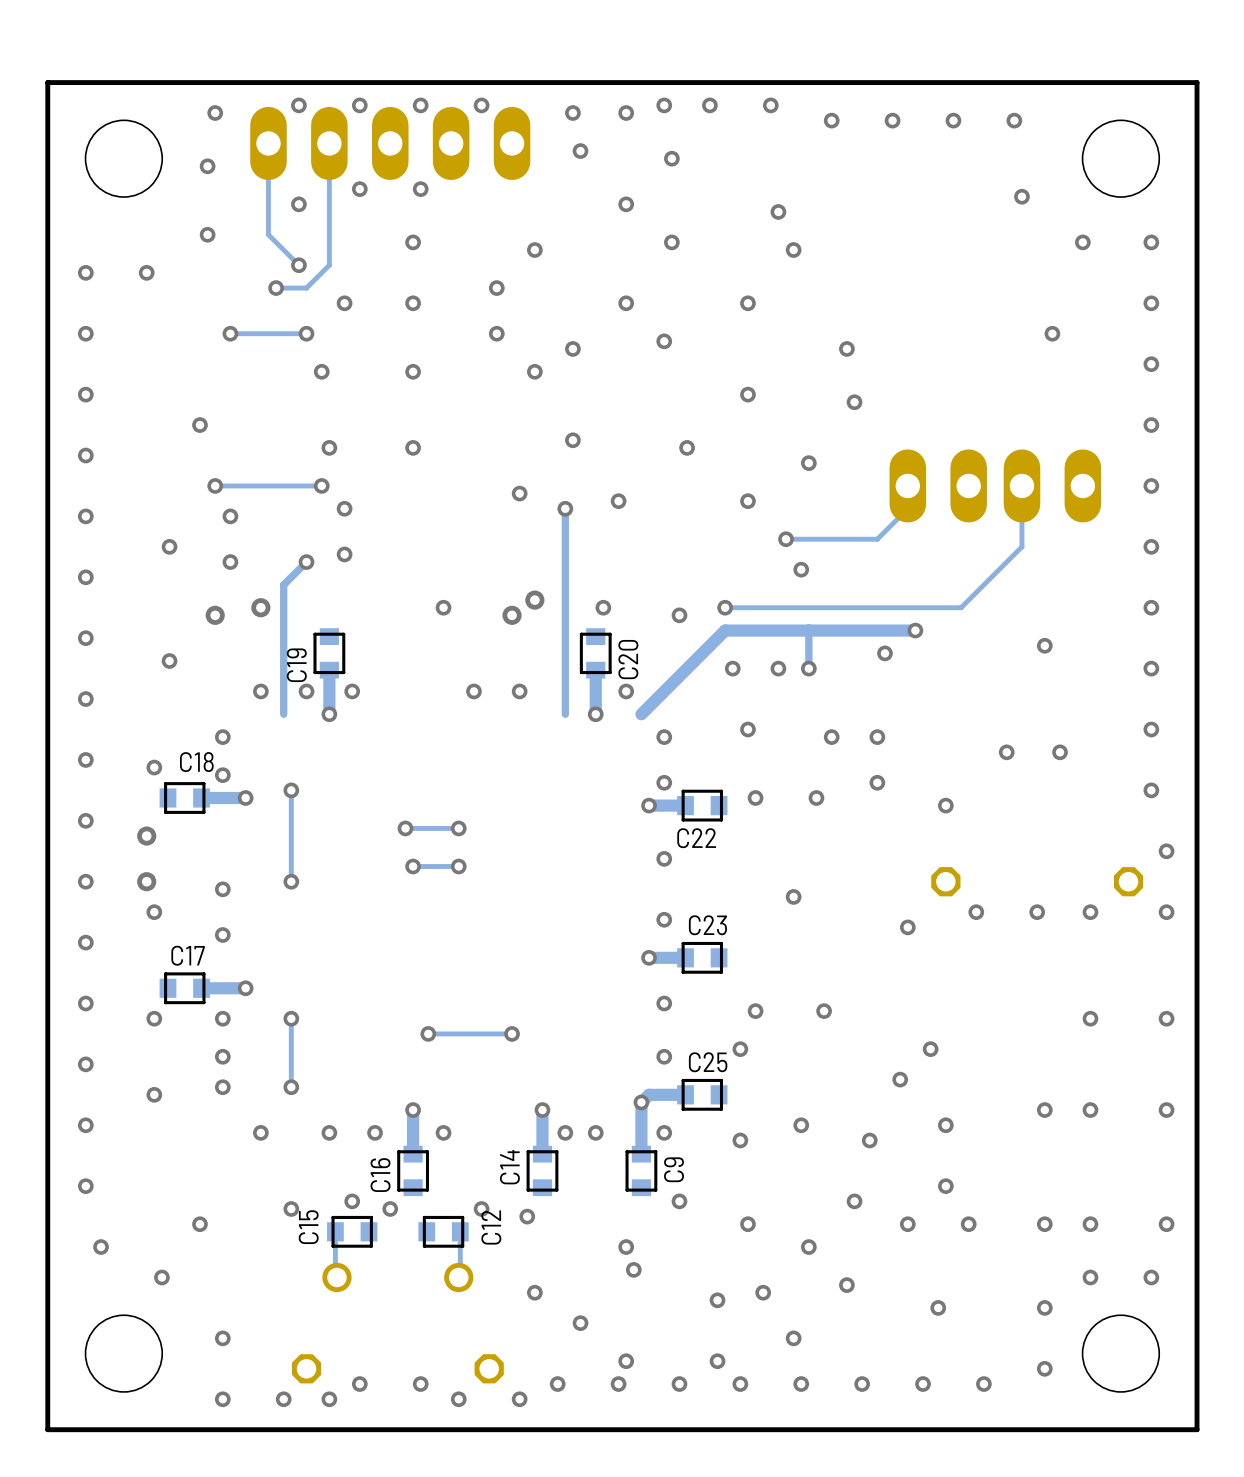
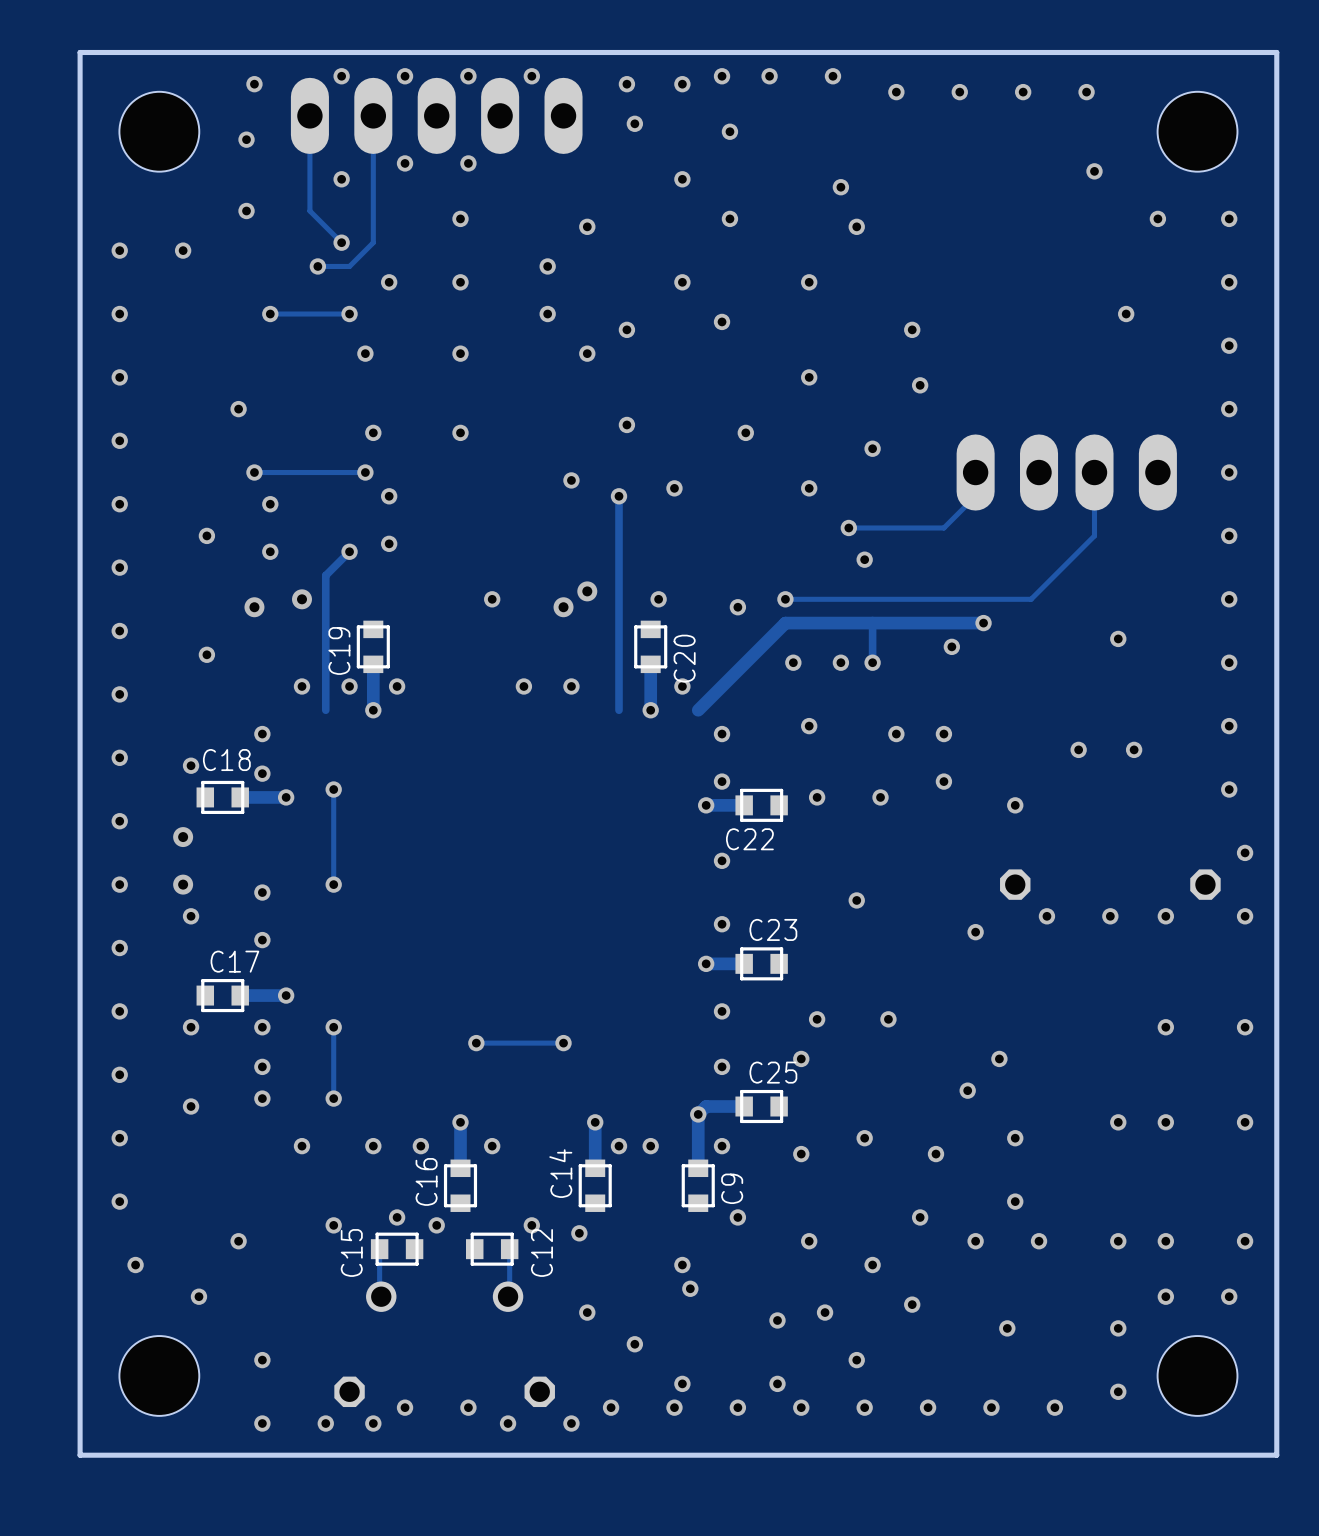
via: (405, 828) -> none
track: (458, 828) (405, 828) -> none
via: (458, 828) -> none
via: (413, 866) -> none
track: (458, 866) (413, 866) -> none
via: (458, 866) -> none

